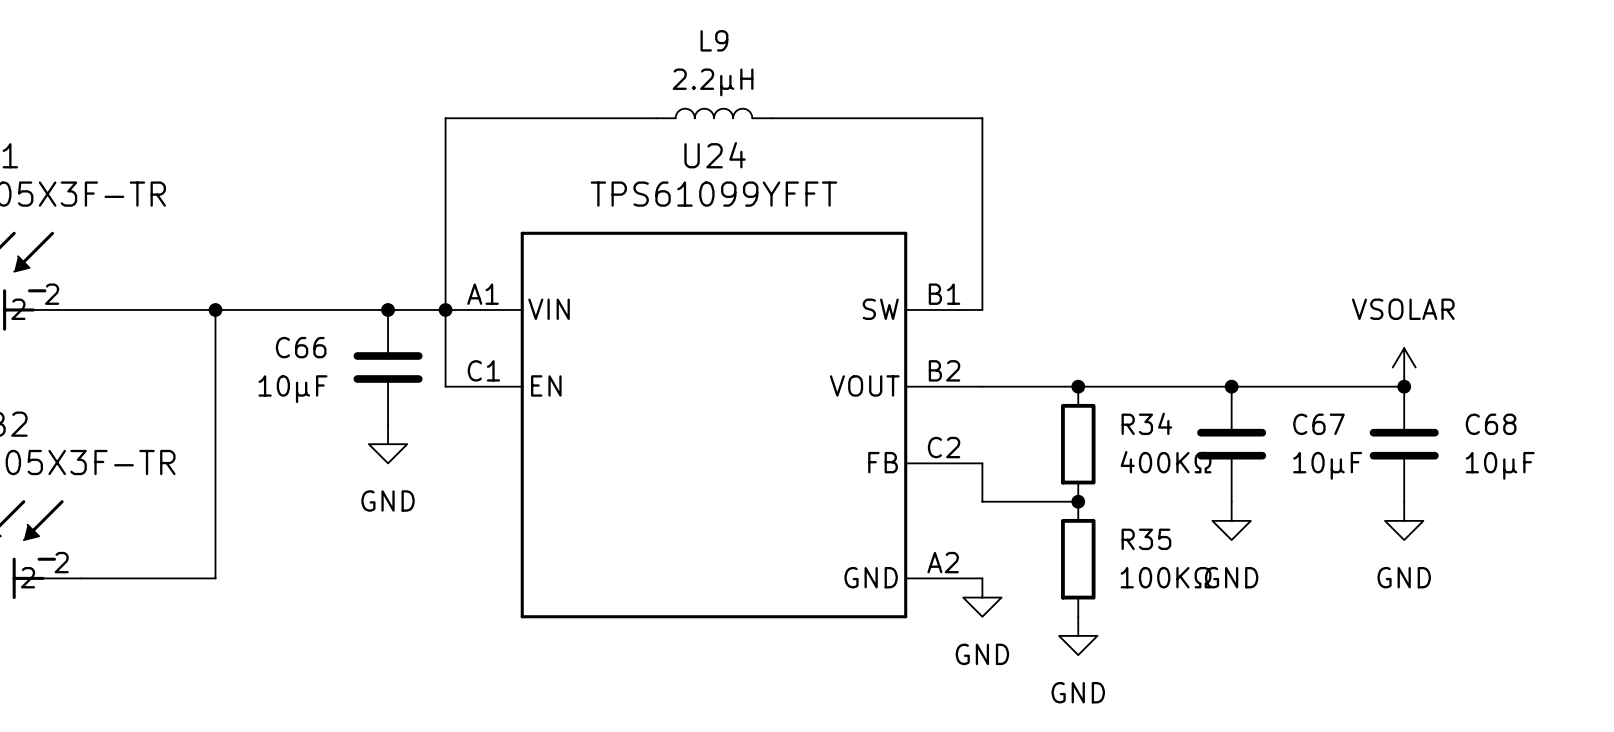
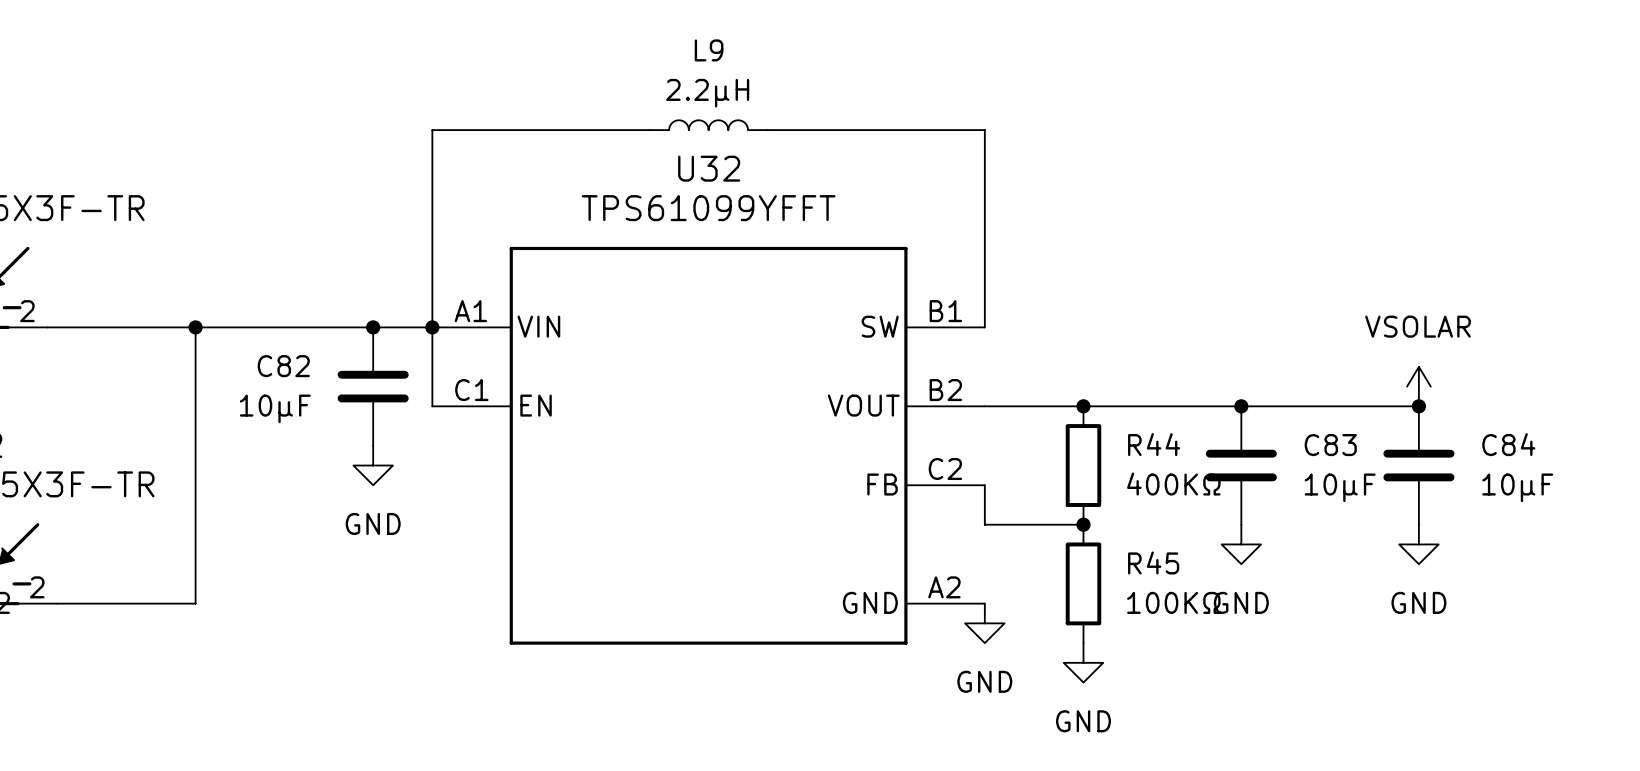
U24 name: U24 (715, 155) -> U32 (709, 168)
C66 name: C66 (301, 347) -> C82 (283, 366)
R34 name: R34 (1146, 423) -> R44 (1154, 444)
C67 name: C67 (1318, 424) -> C83 (1330, 445)
C68 name: C68 (1491, 424) -> C84 (1508, 444)
R35 name: R35 (1146, 539) -> R45 (1153, 562)

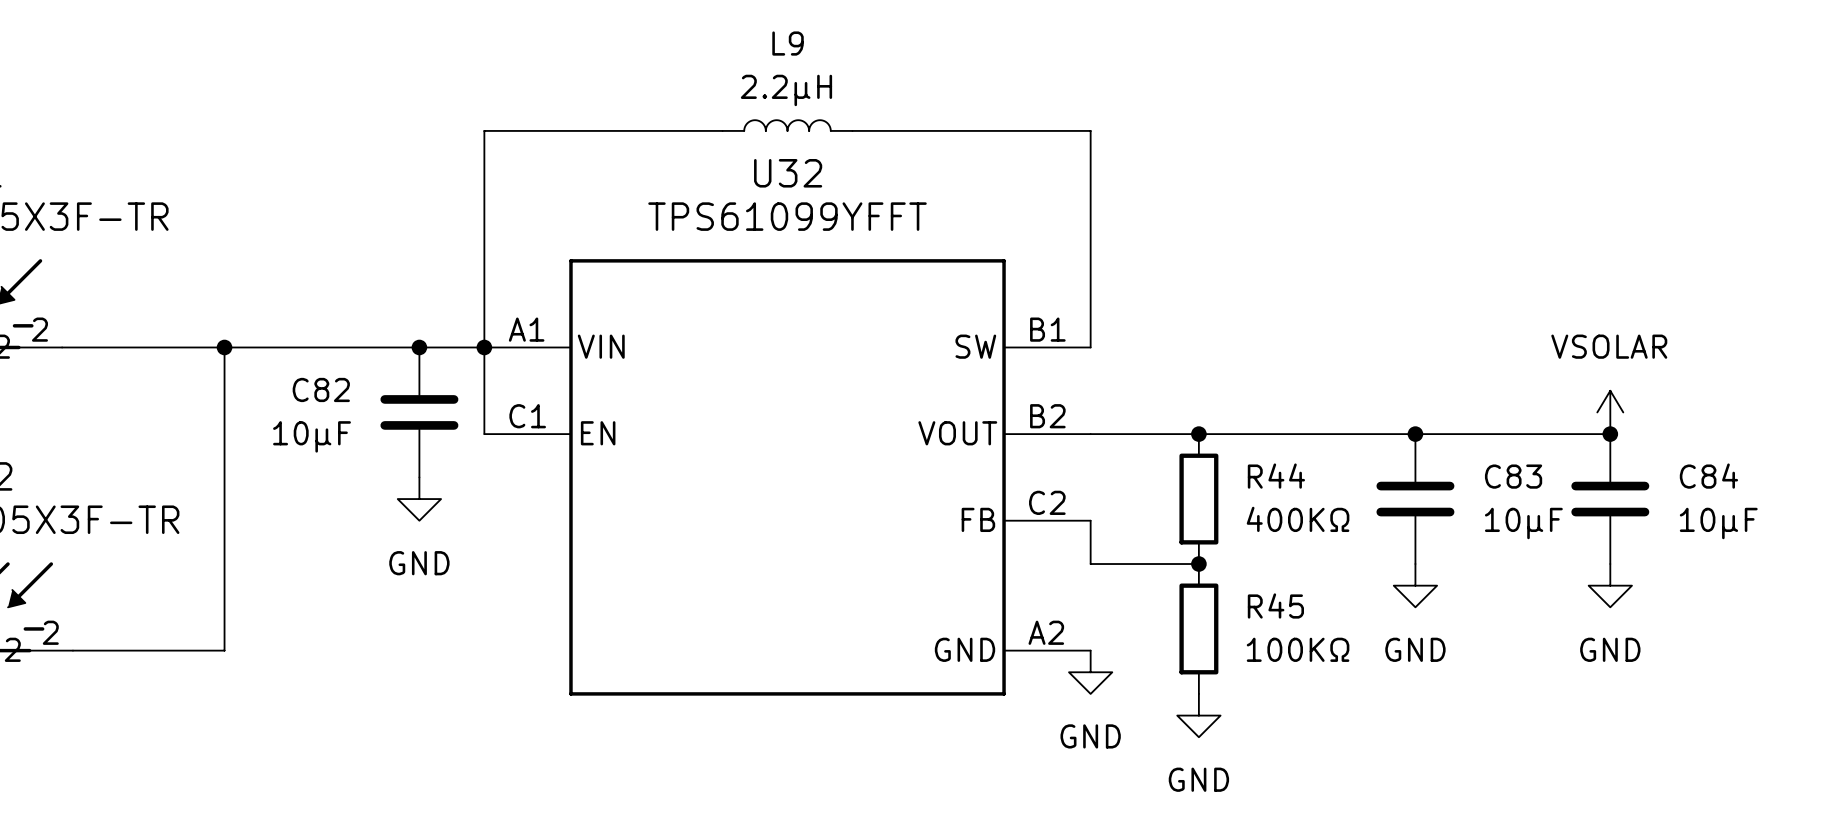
power symbol position: VSOLAR (1418, 386) -> VSOLAR (1610, 412)
junction position: (1241, 406) -> (1415, 434)
wire: none -> (1567, 434) (1610, 434)
junction position: (1418, 406) -> (1610, 434)
C83 position: (1241, 465) -> (1415, 499)
C84 position: (1418, 465) -> (1610, 499)
power symbol position: GND (1241, 544) -> GND (1415, 585)
power symbol position: GND (1418, 544) -> GND (1610, 585)

